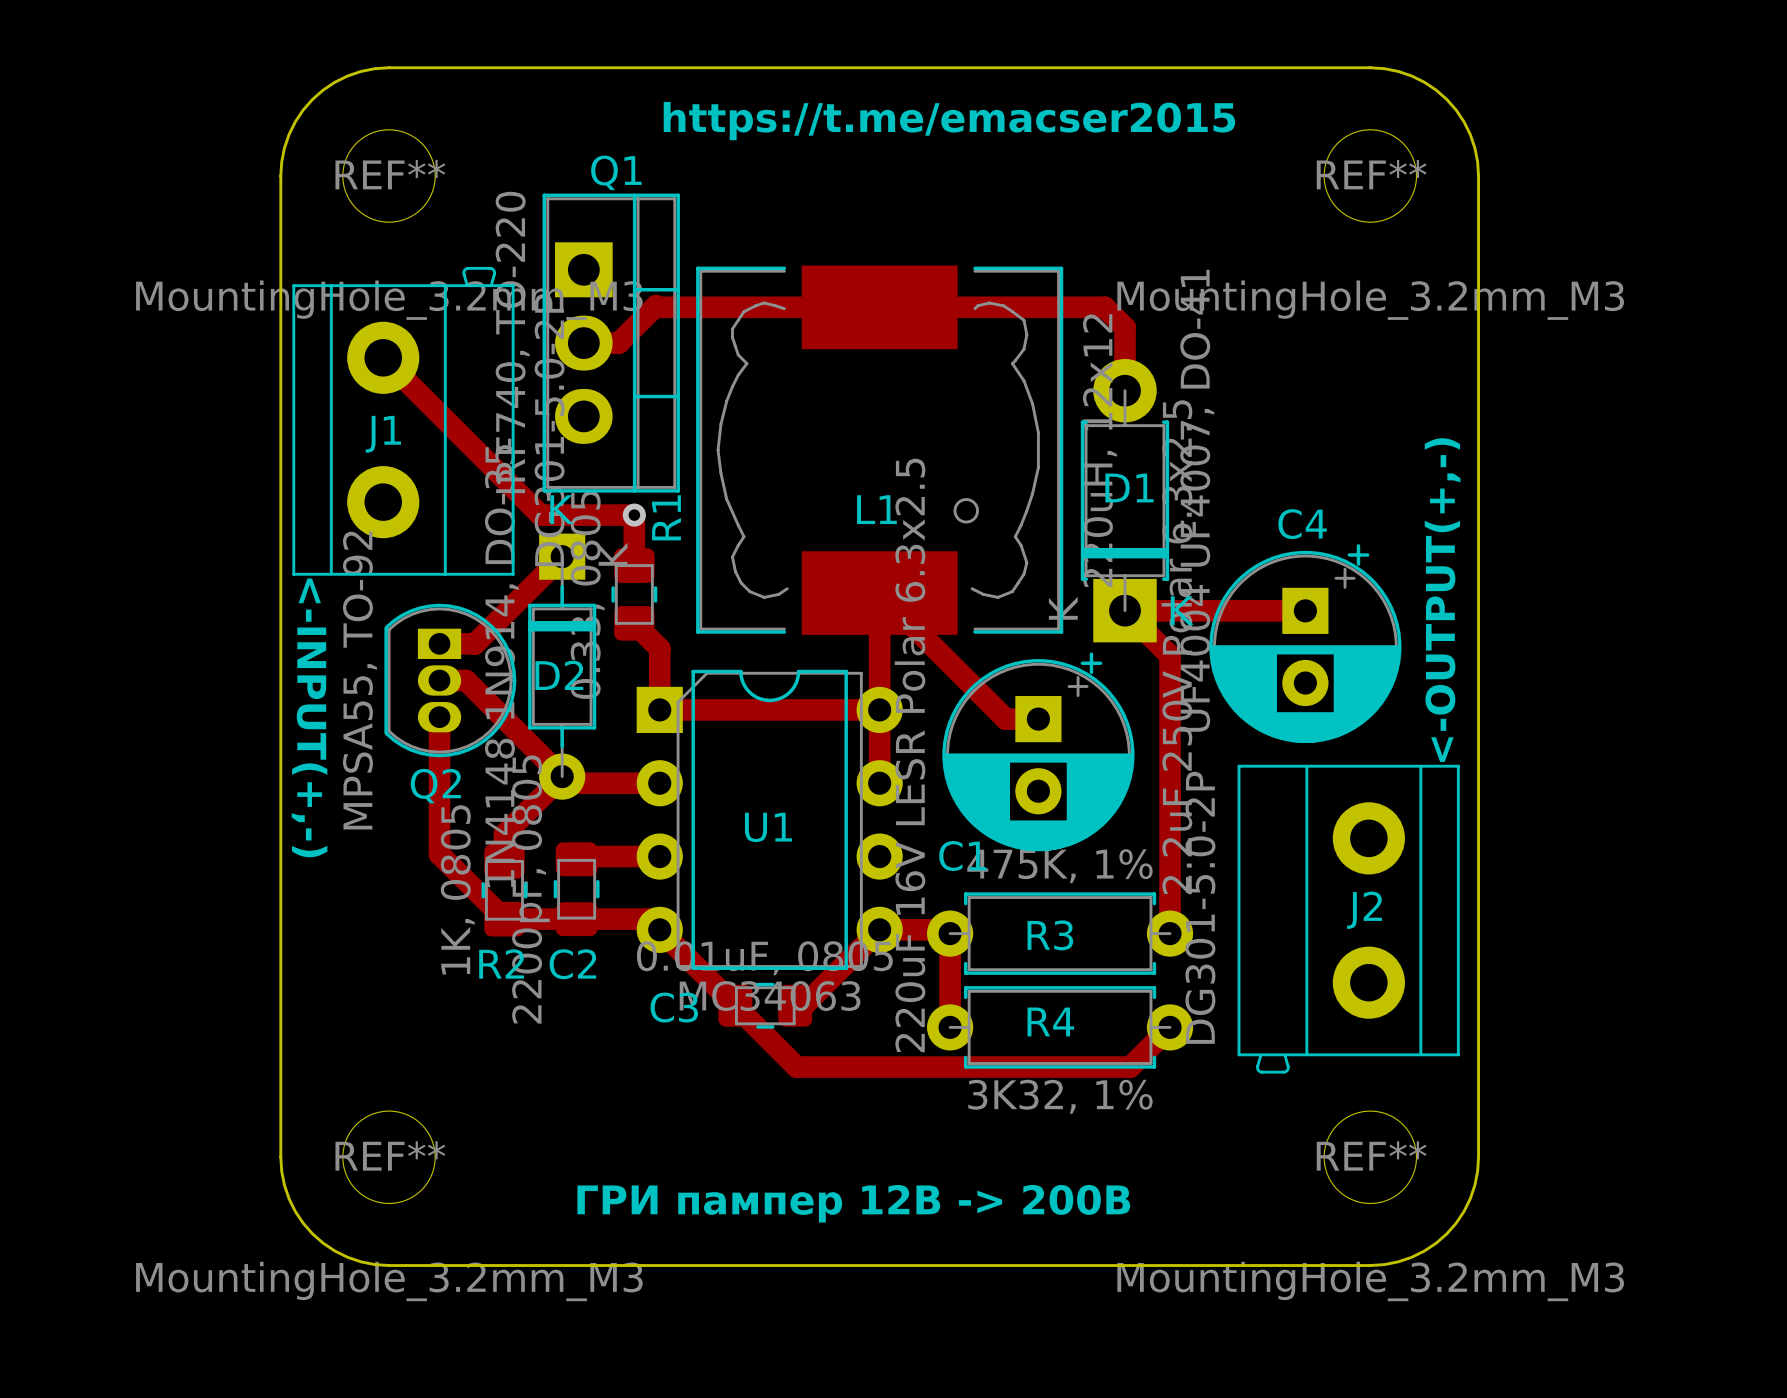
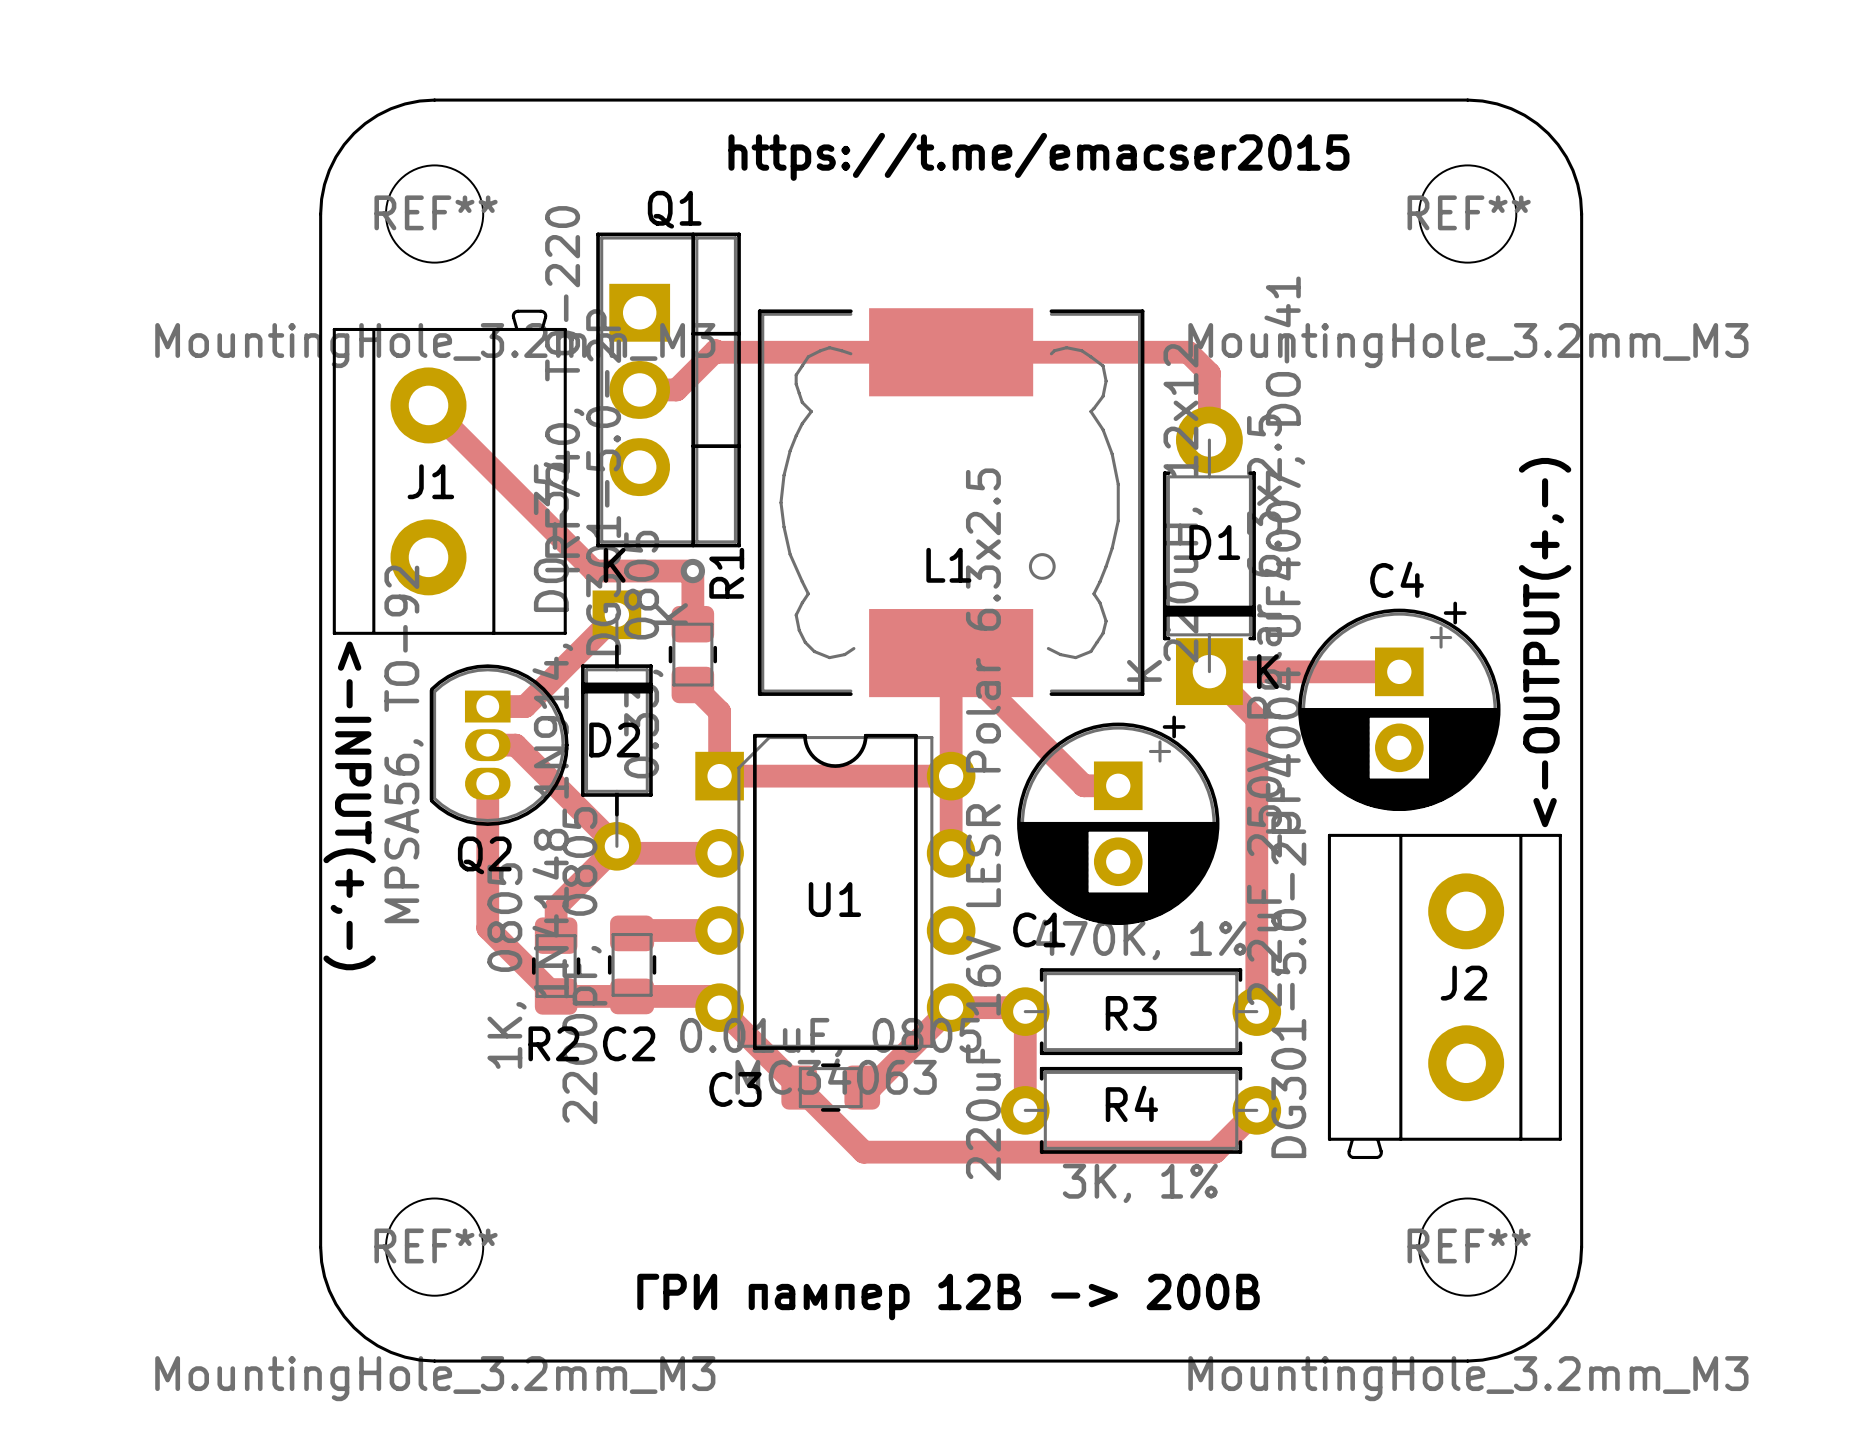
Q2 value: MPSA55, TO-92 (359, 680) -> MPSA56, TO-92 (404, 744)
R3 value: 475K, 1% (1059, 866) -> 470K, 1% (1141, 939)
R4 value: 3K32, 1% (1060, 1096) -> 3K, 1% (1140, 1183)

